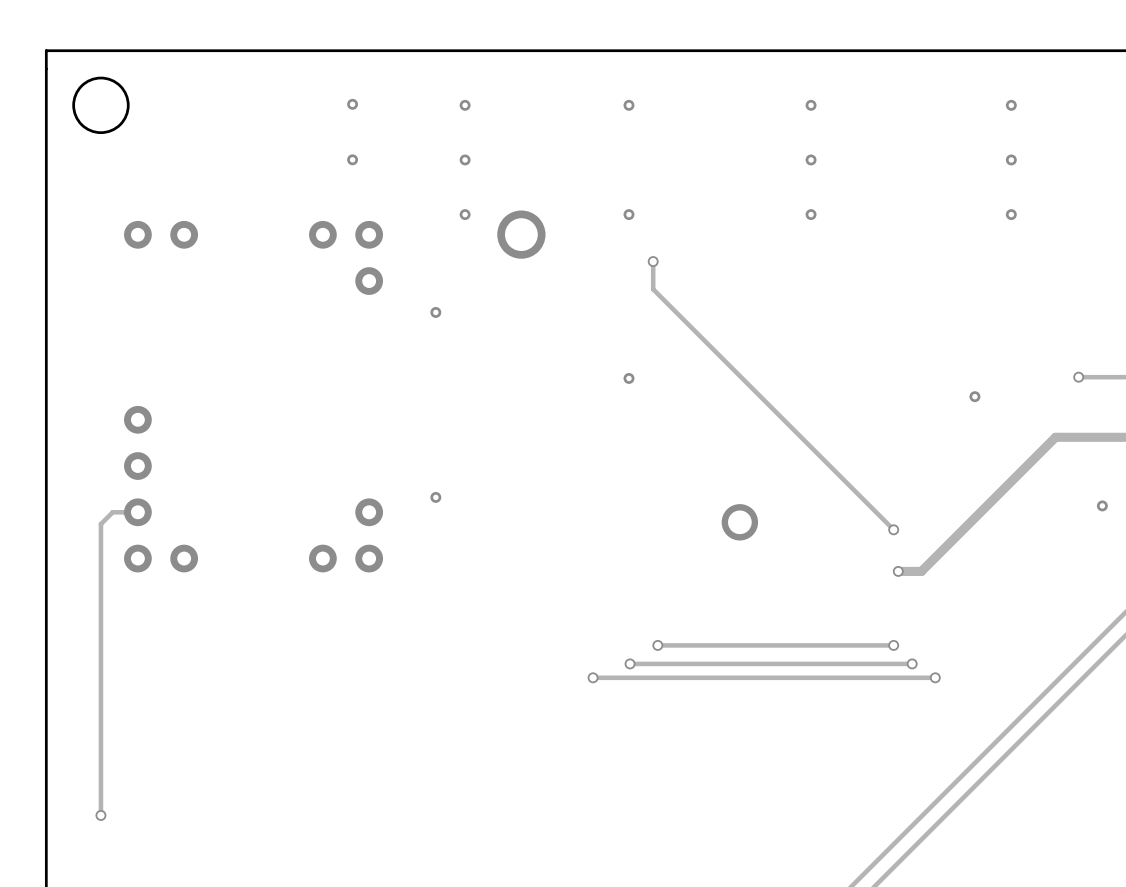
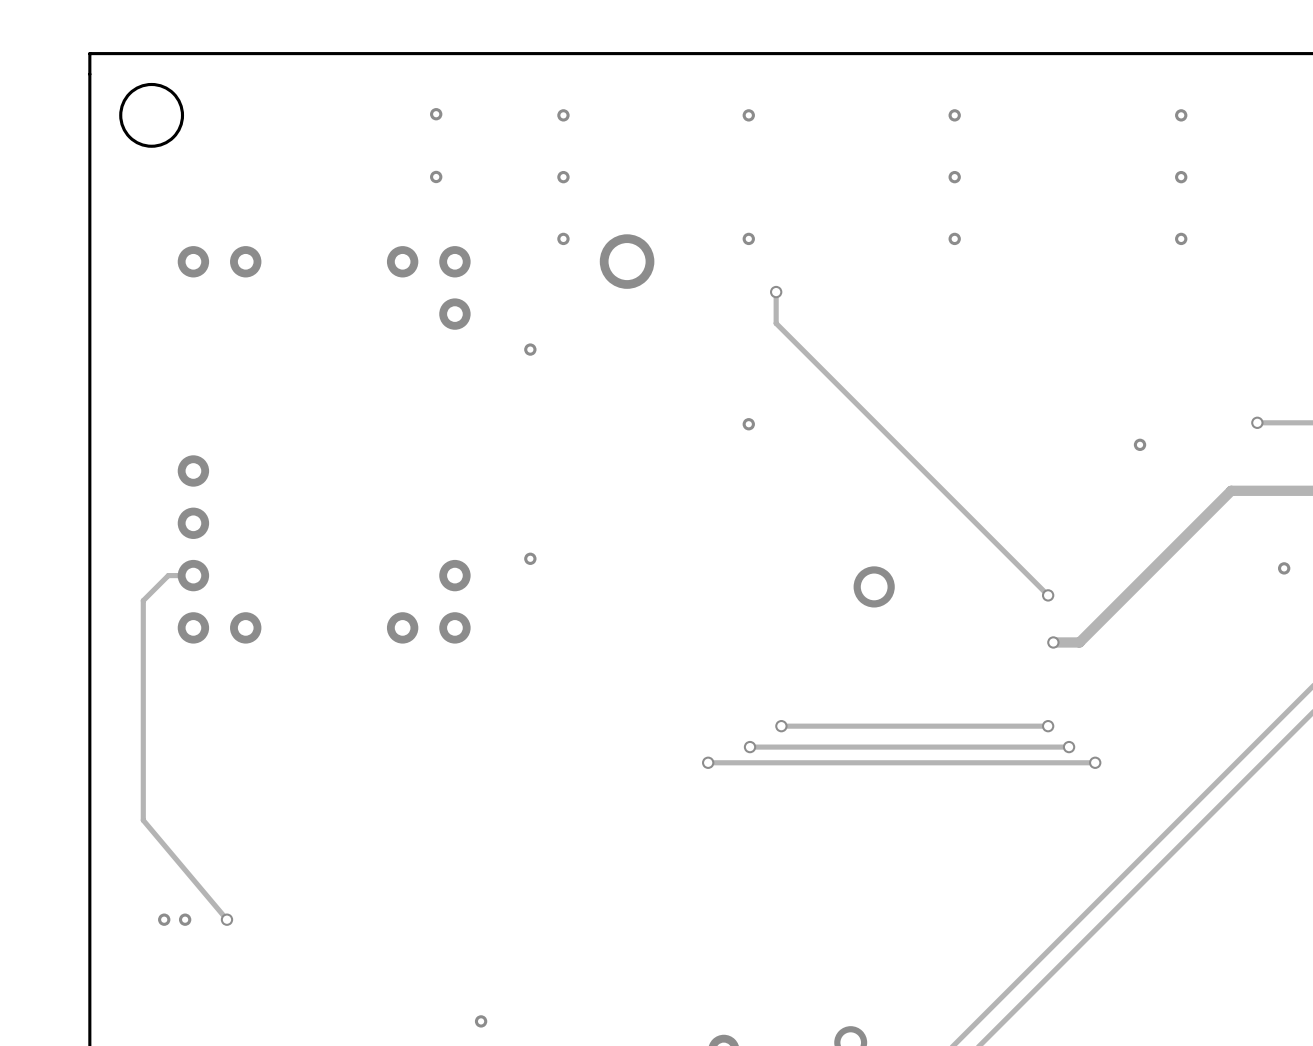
track: (115, 512) (112, 512) (100, 524) (100, 815) -> (168, 575) (143, 600) (143, 820) (226, 919)
via position: (100, 815) -> (226, 919)
part: none -> (164, 919)
part: none -> (185, 919)

